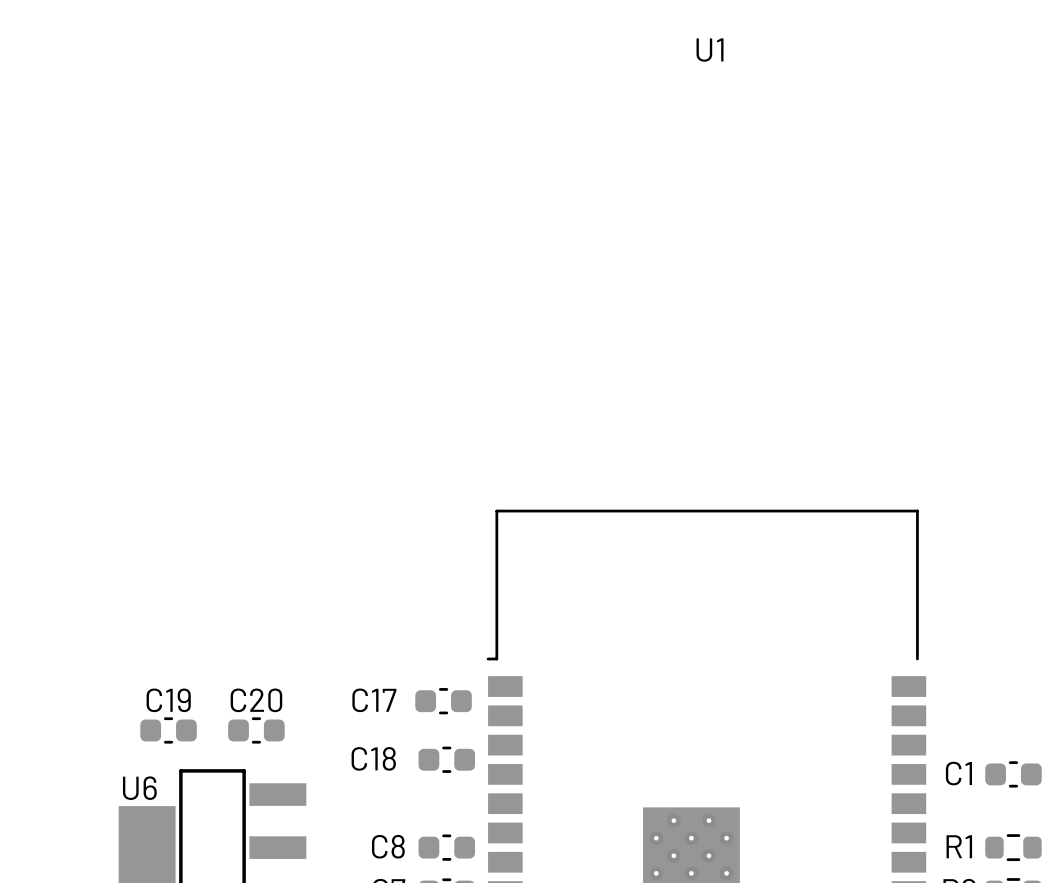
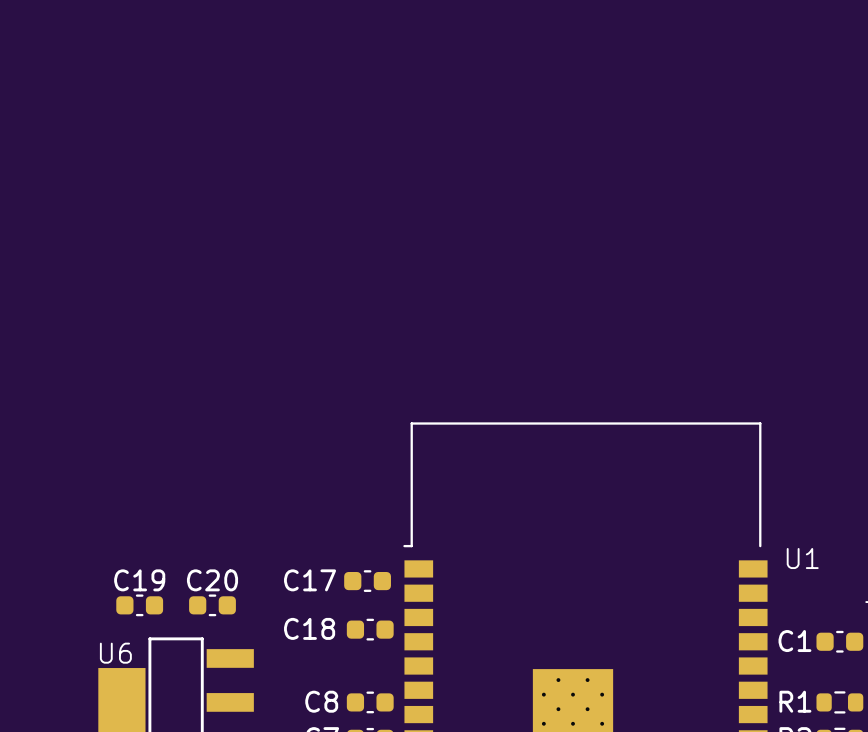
U1 name position: U1 (710, 50) -> U1 (802, 558)

